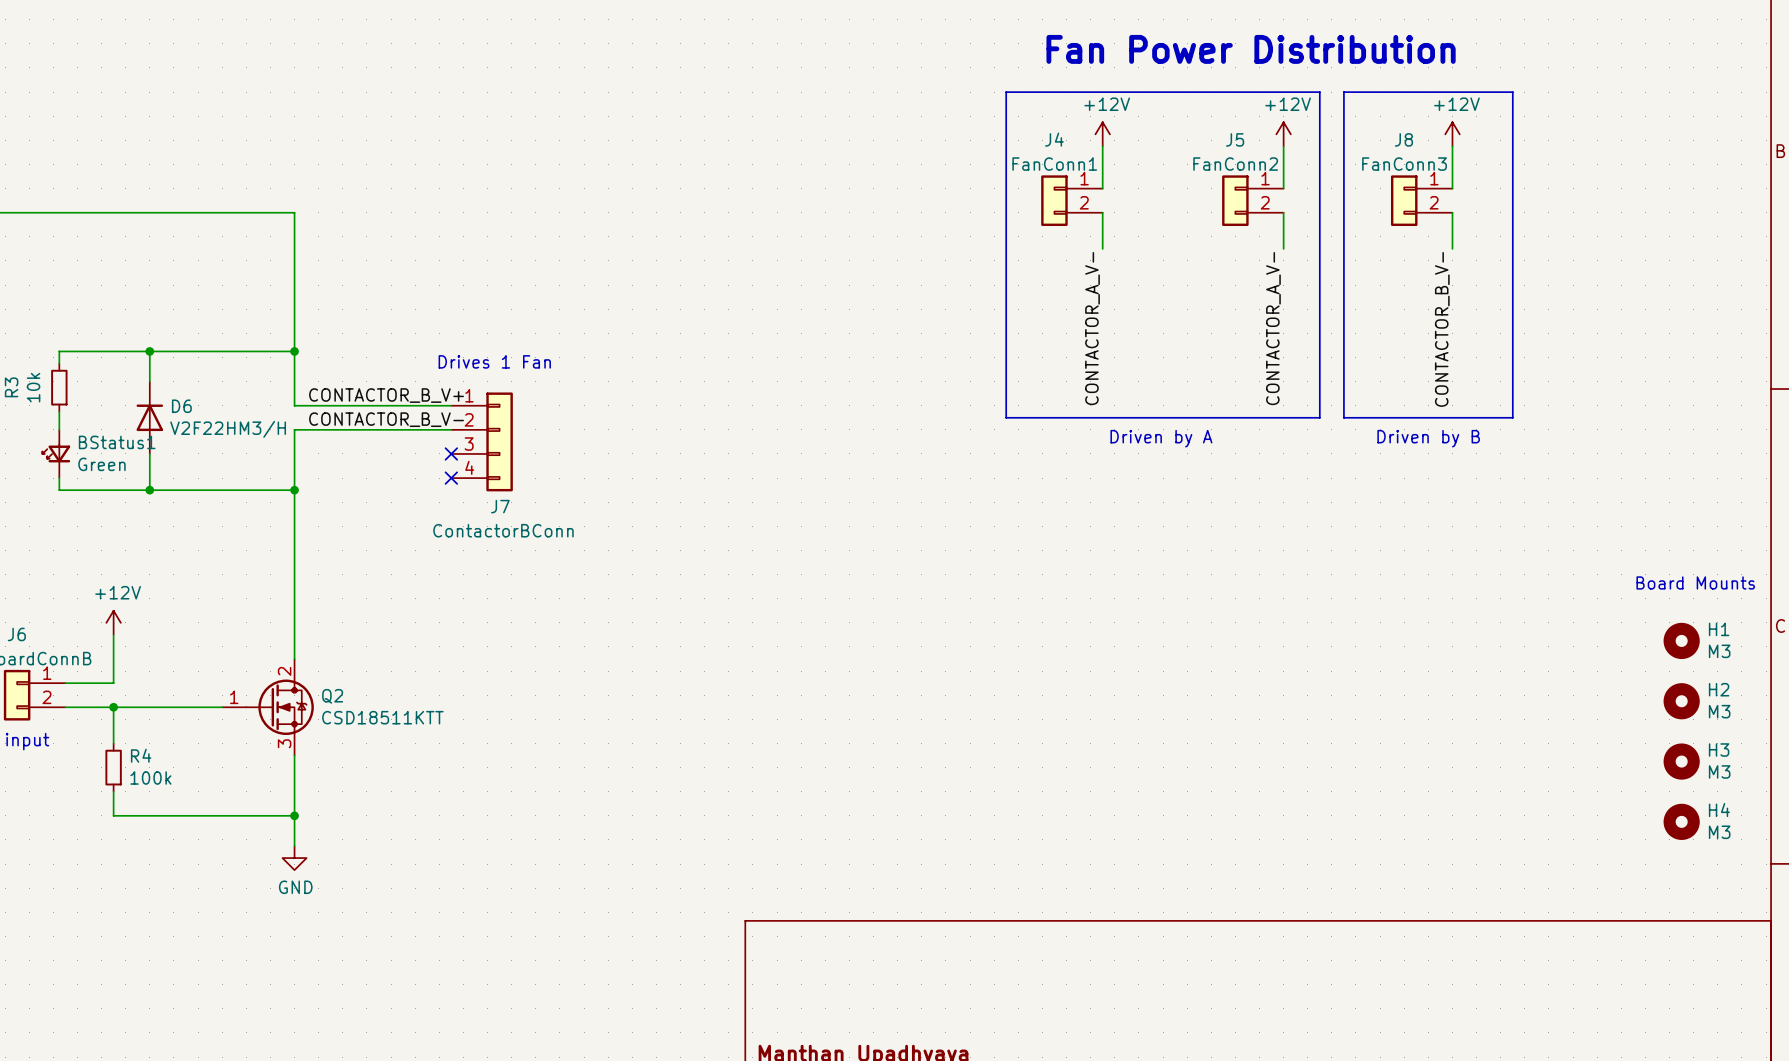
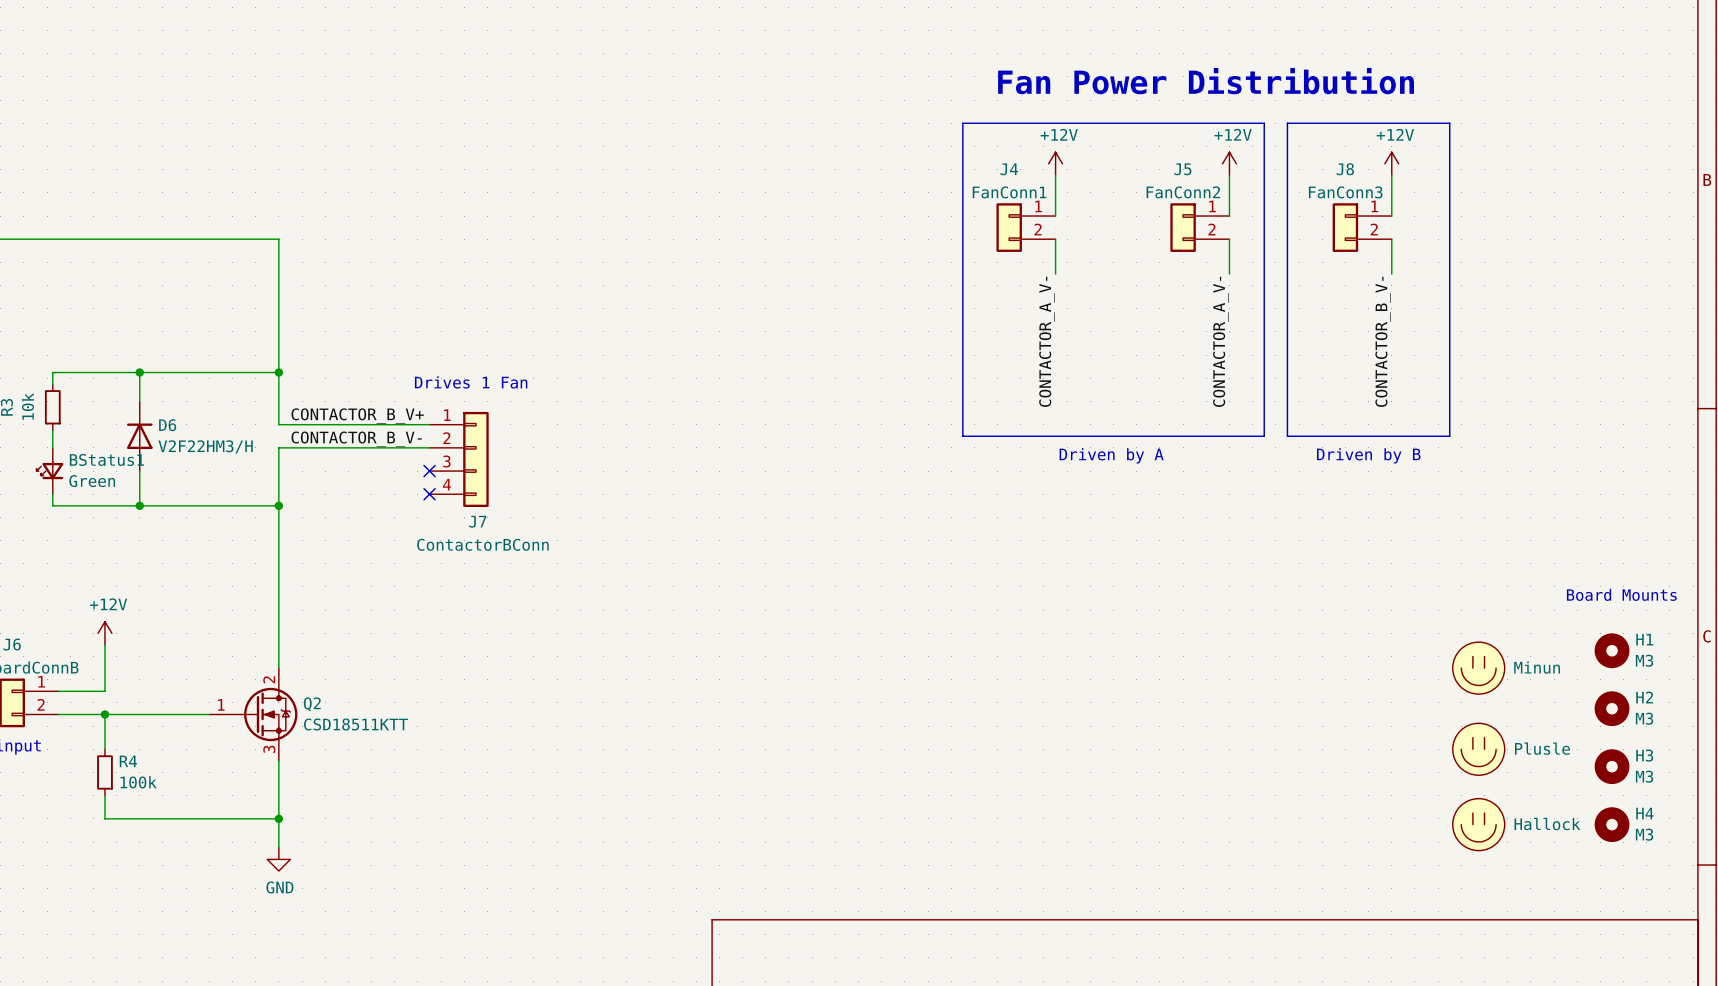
part: none -> Minun (1478, 668)
part: none -> Plusle (1478, 749)
part: none -> Hallock (1478, 824)

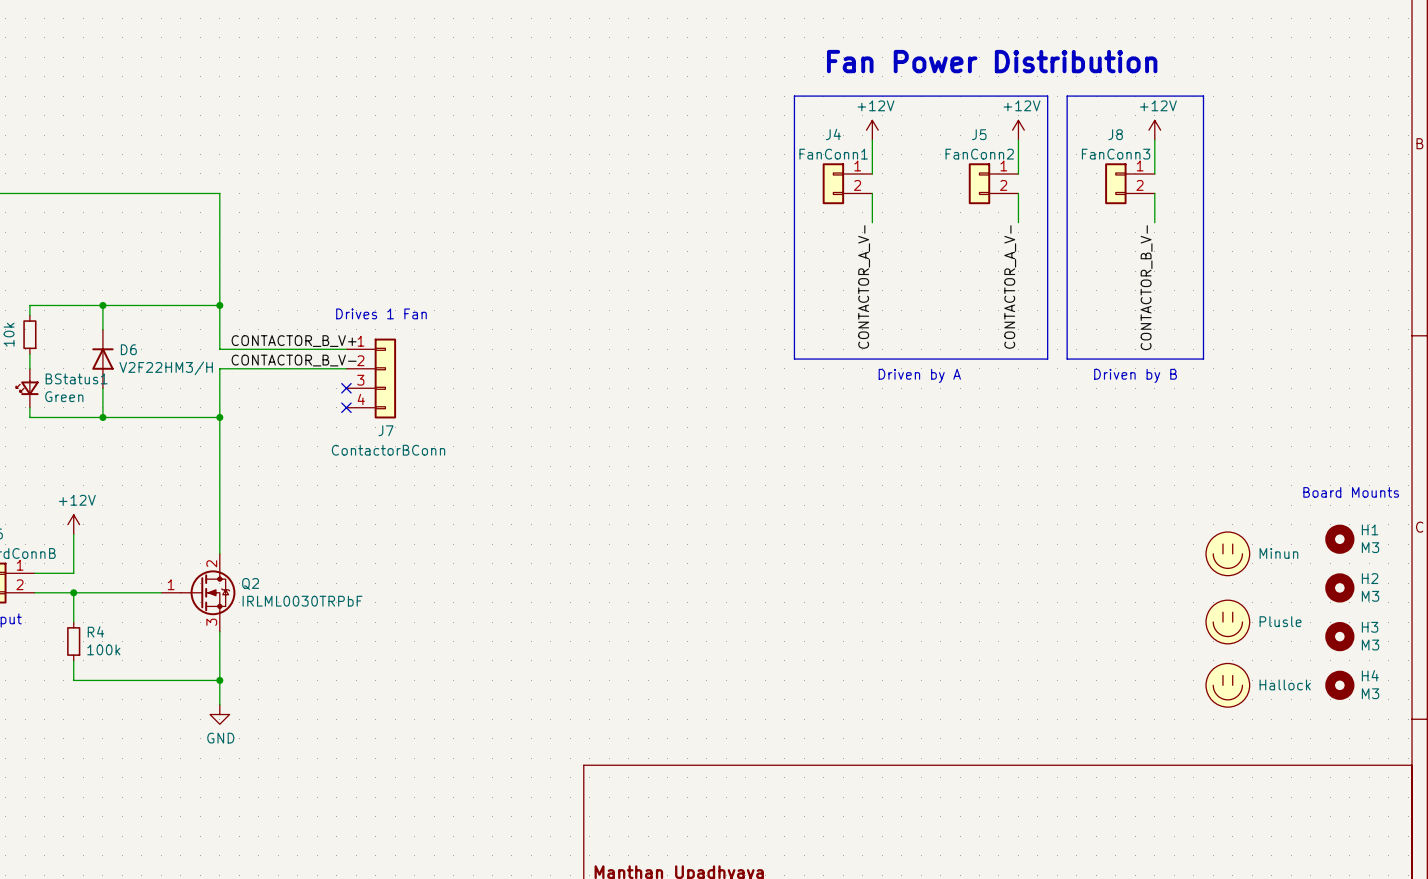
Q2 value: CSD18511KTT (355, 724) -> IRLML0030TRPbF (302, 601)

